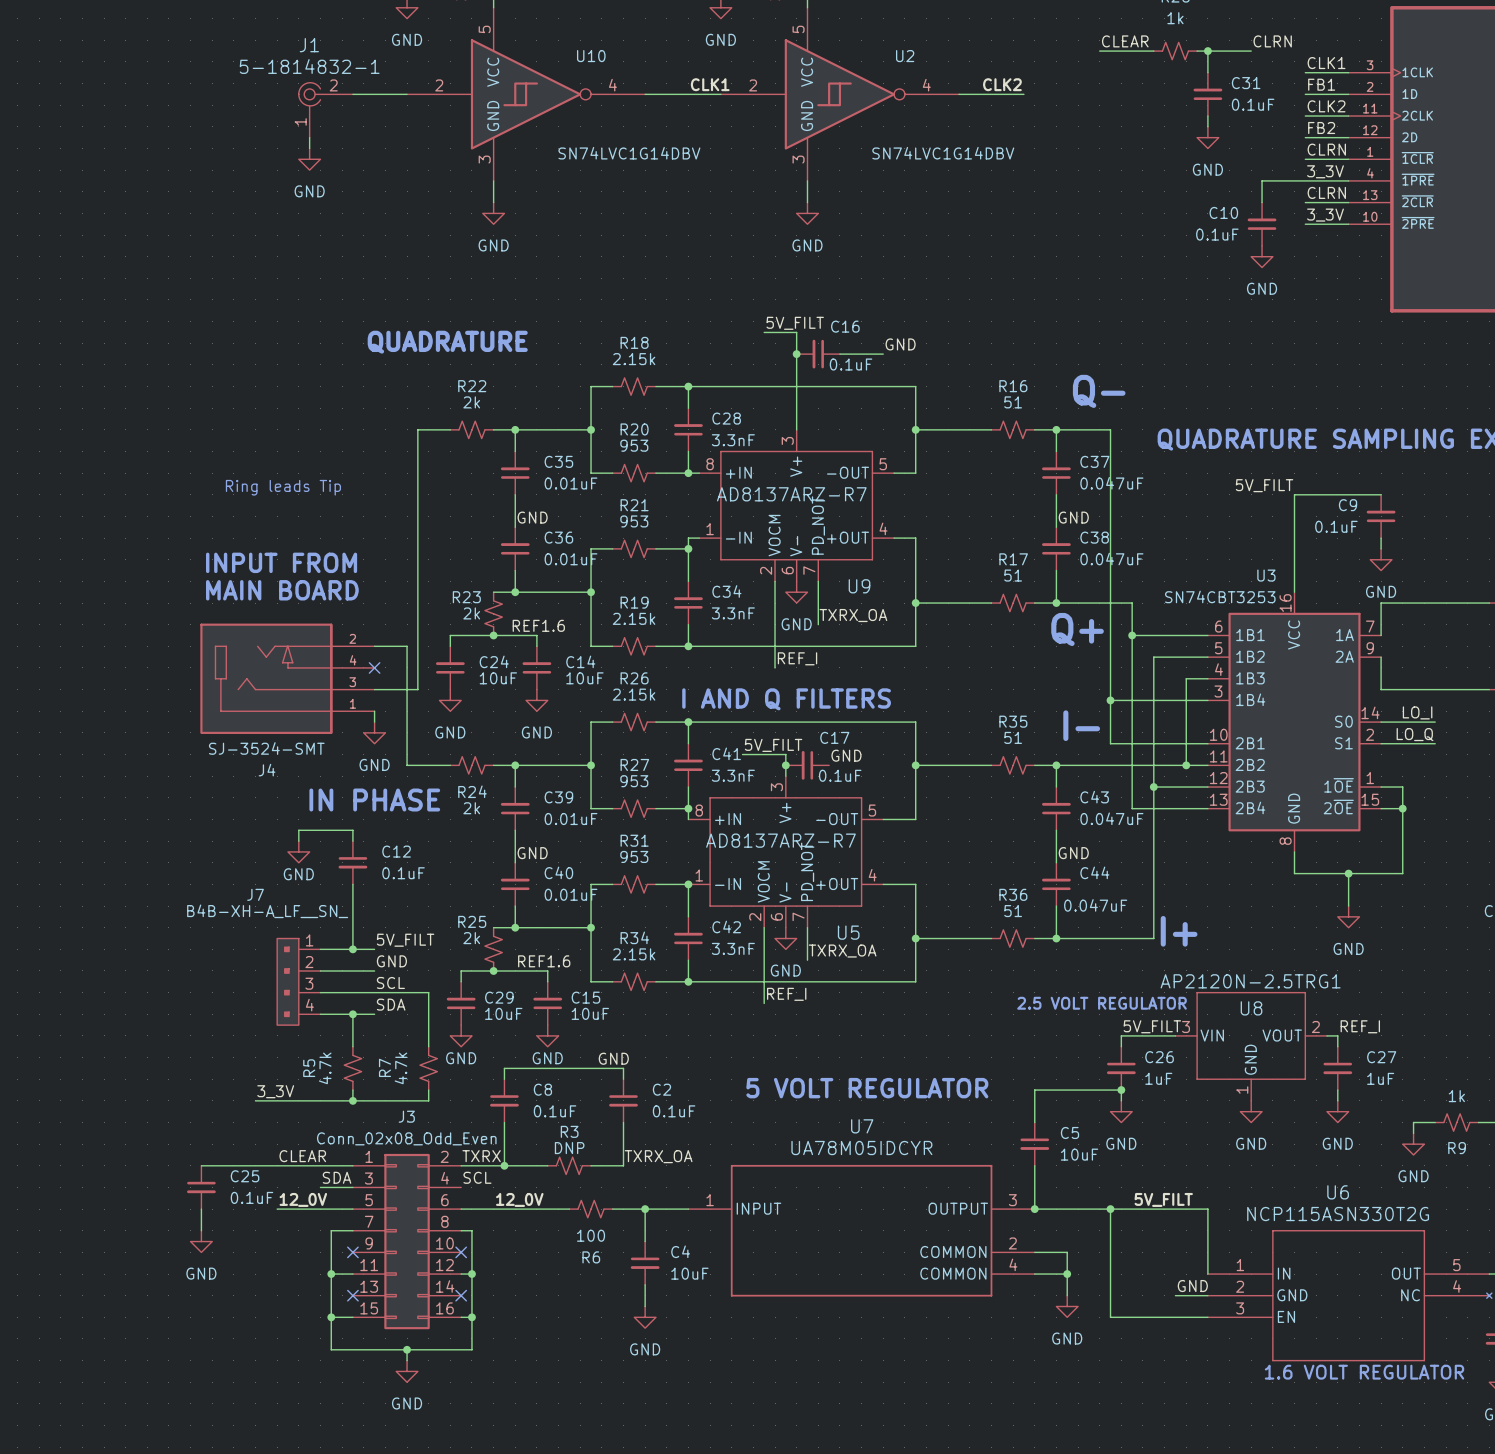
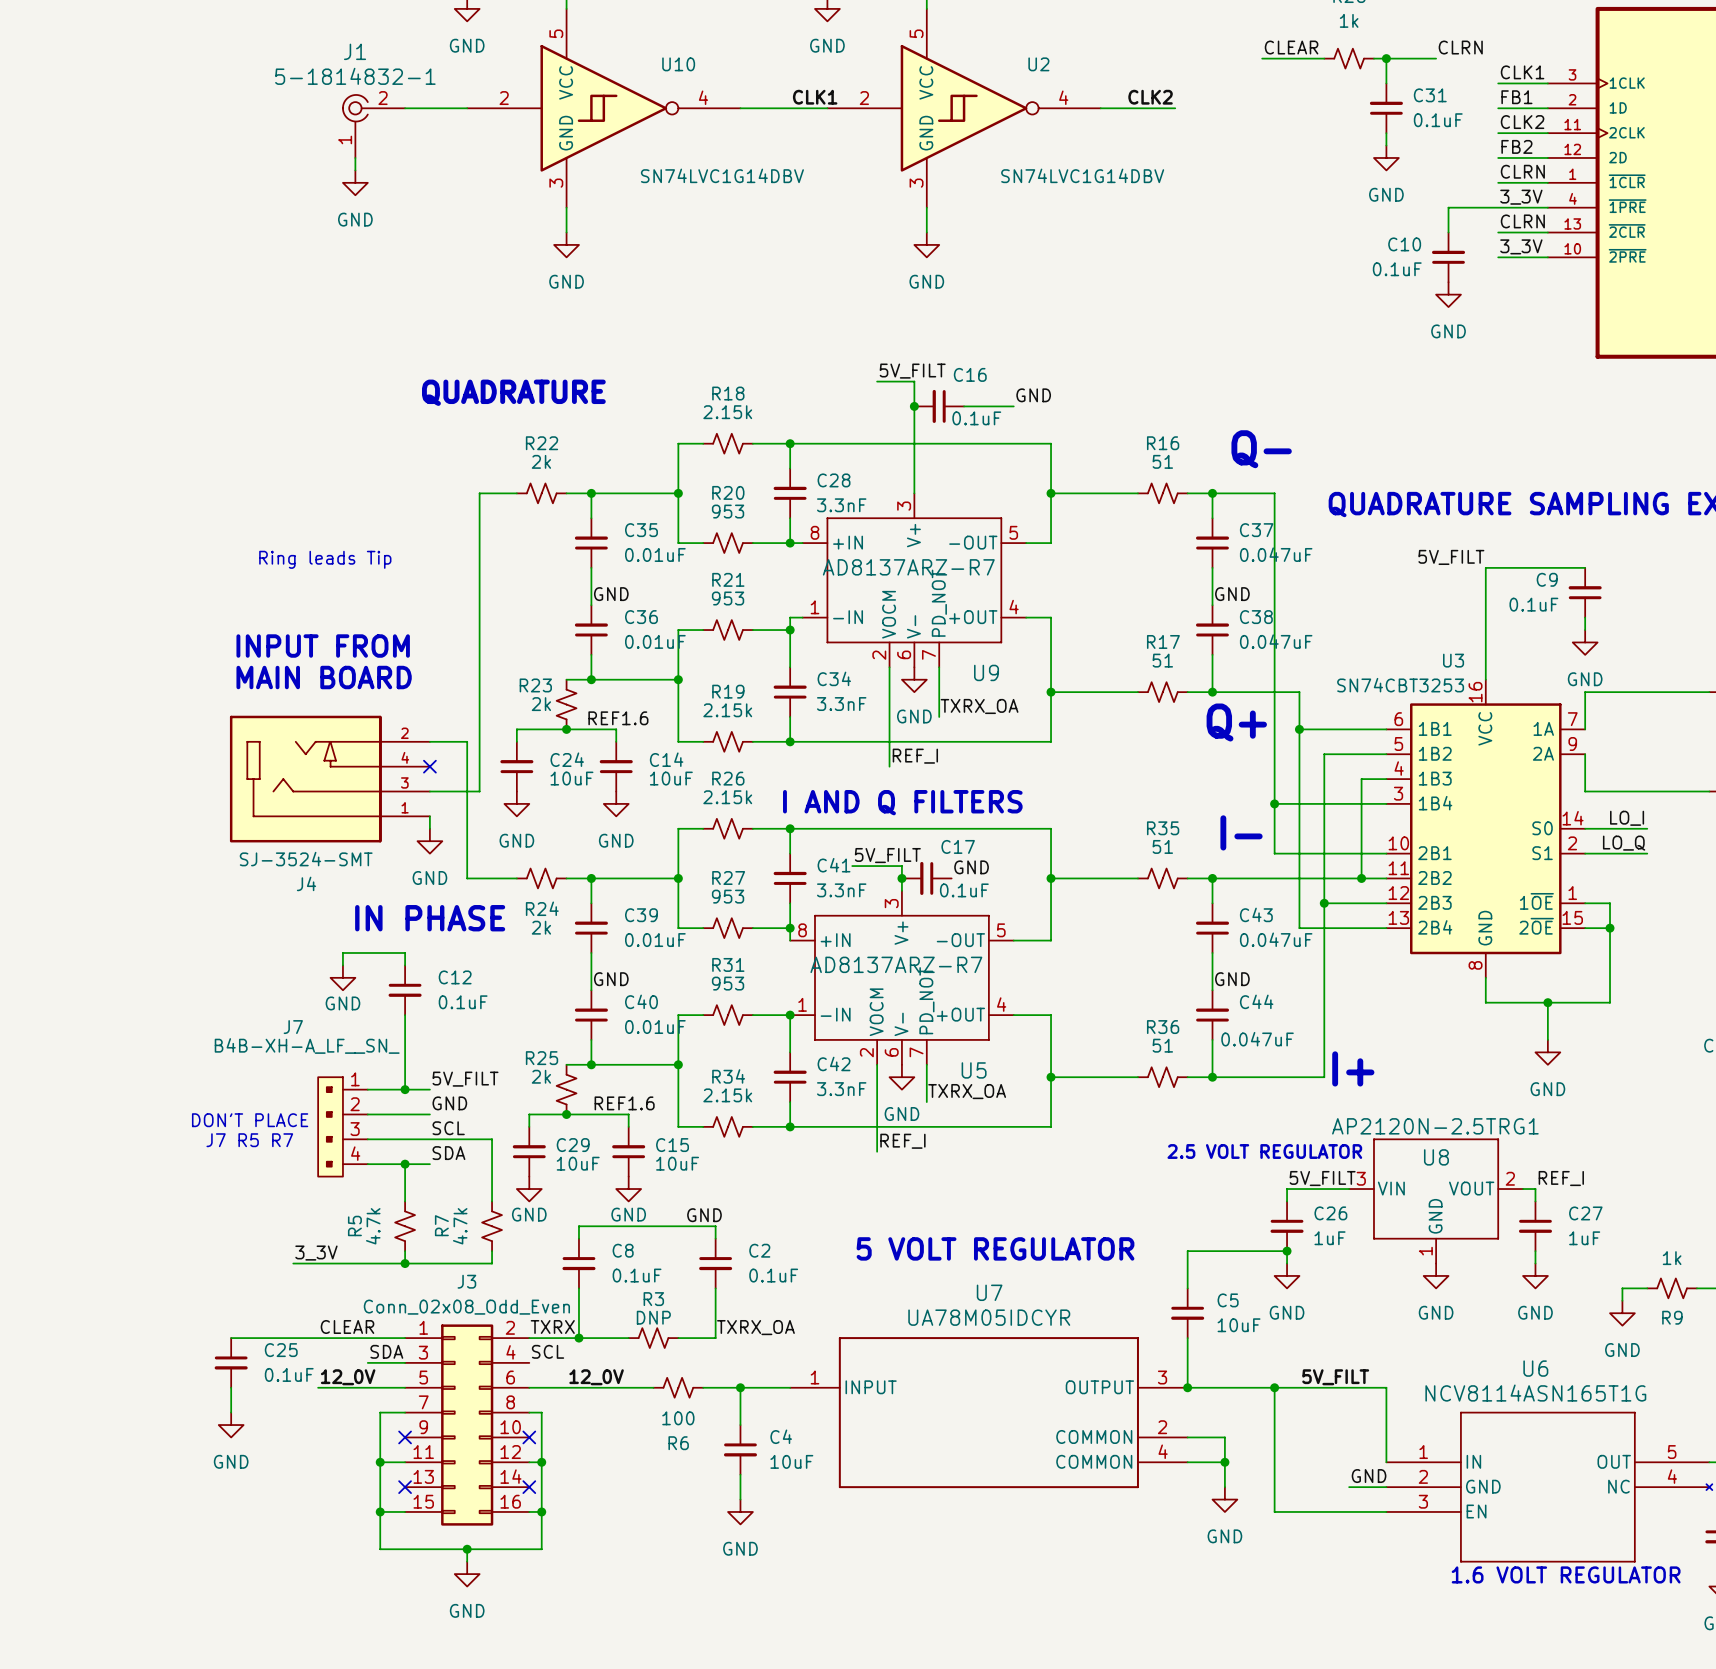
text: none -> DON'T PLACE (250, 1120)
text: none -> J7 R5 R7 (249, 1140)
U6 value: NCP115ASN330T2G (1338, 1214) -> NCV8114ASN165T1G (1535, 1393)

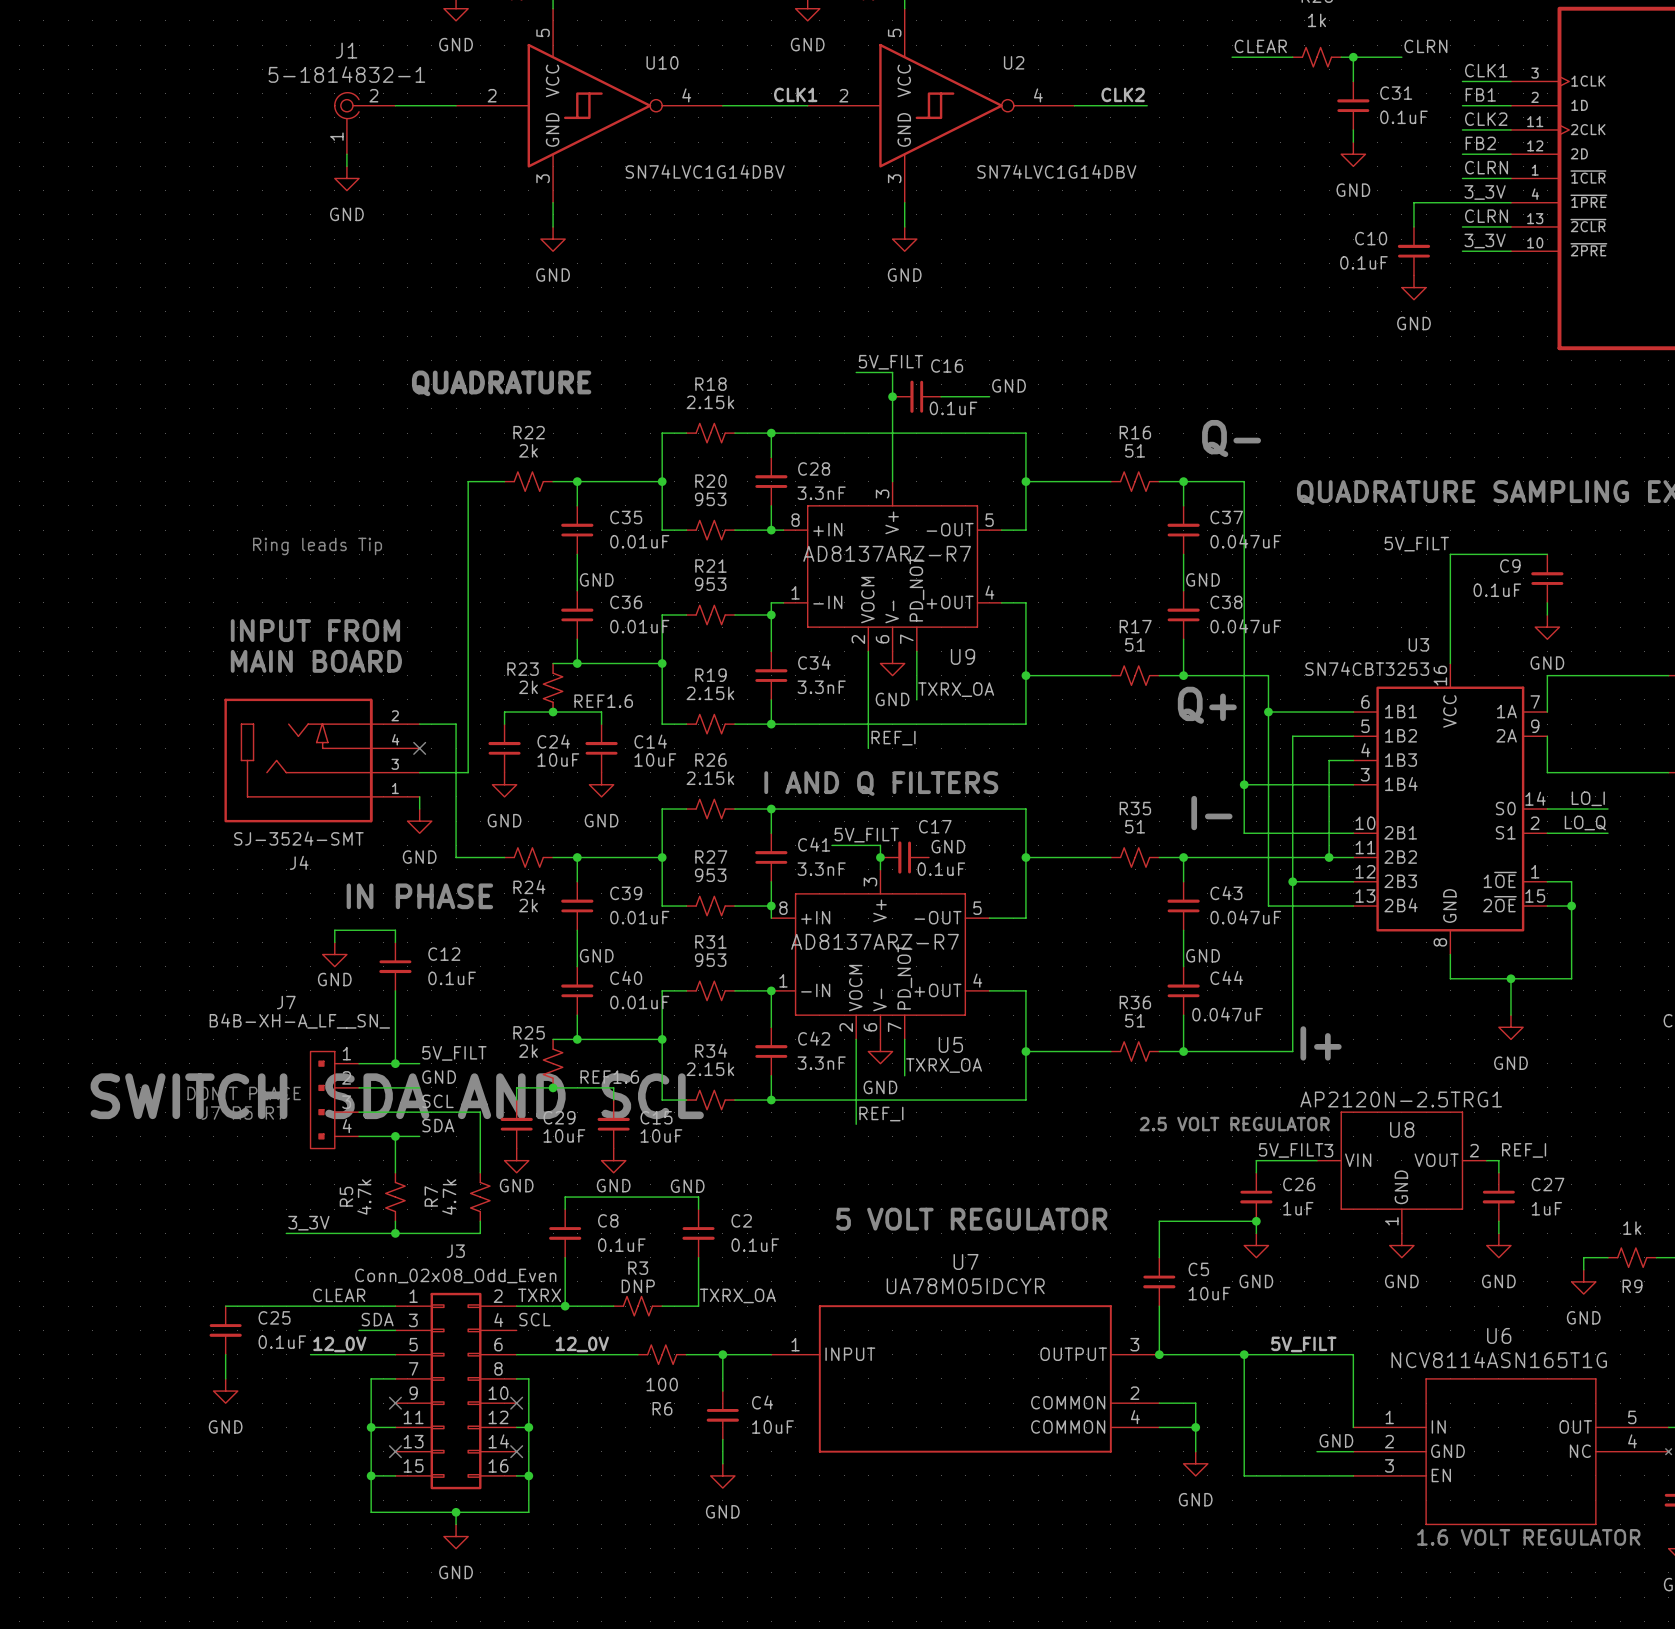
text: none -> SWITCH SDA AND SCL (397, 1096)

